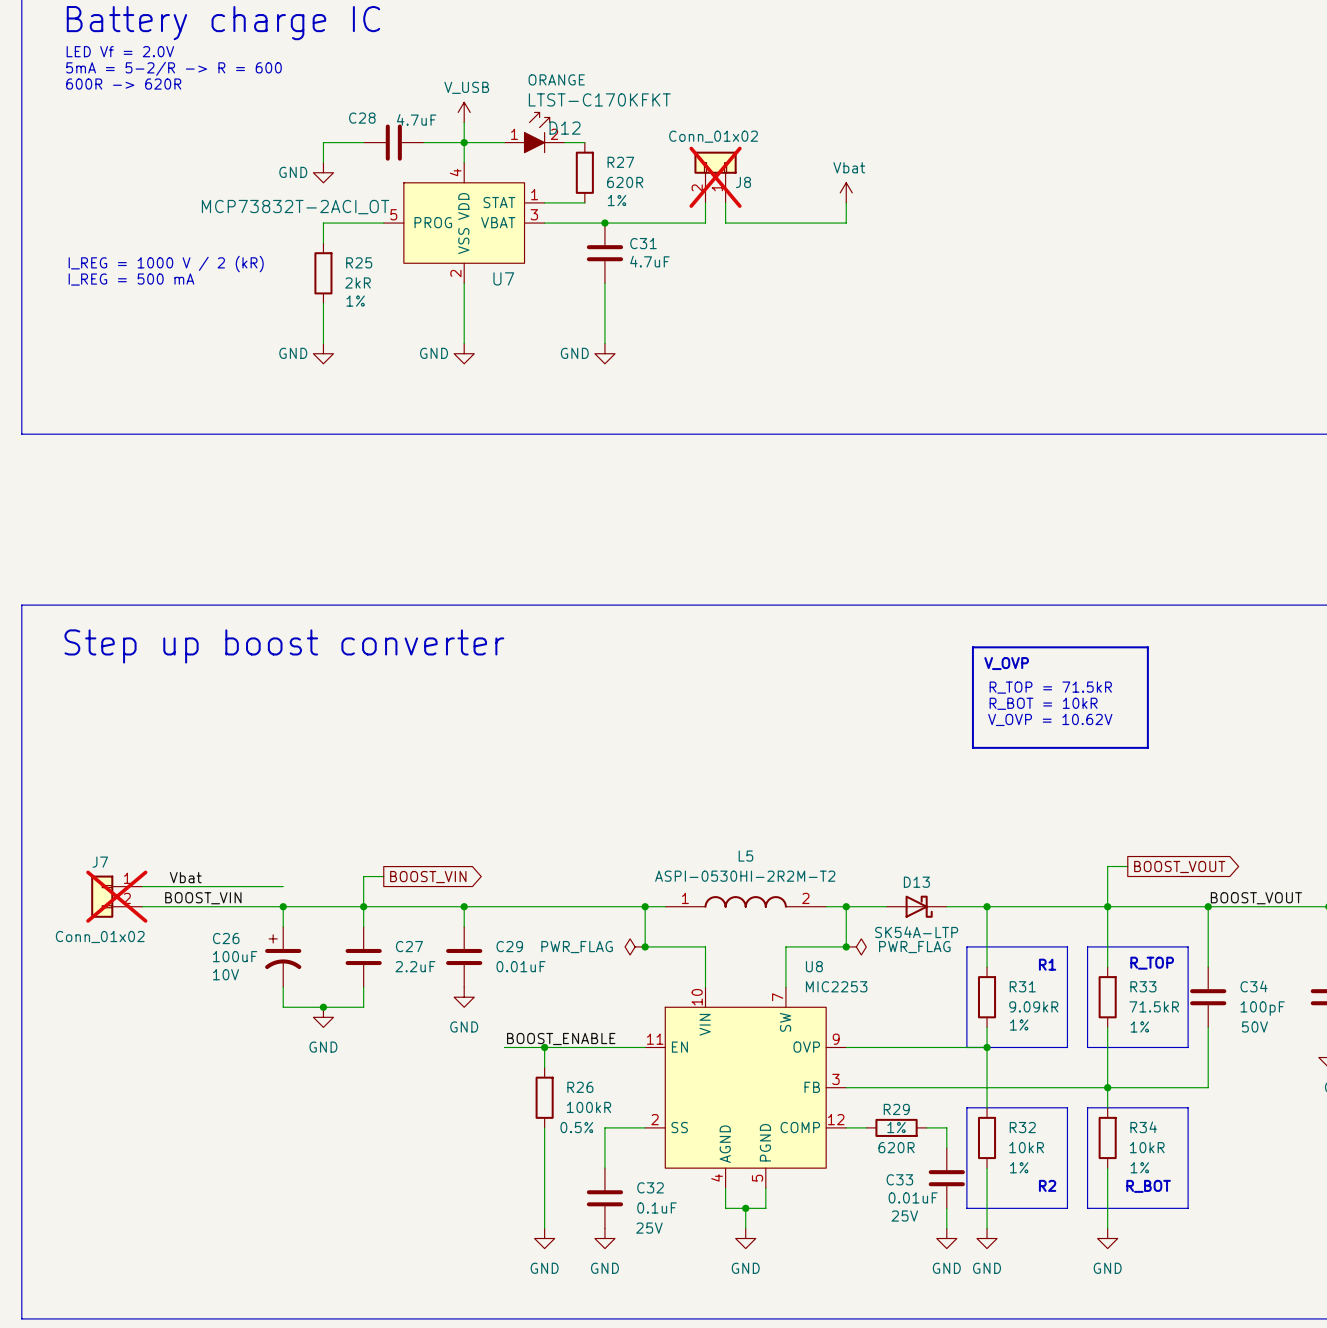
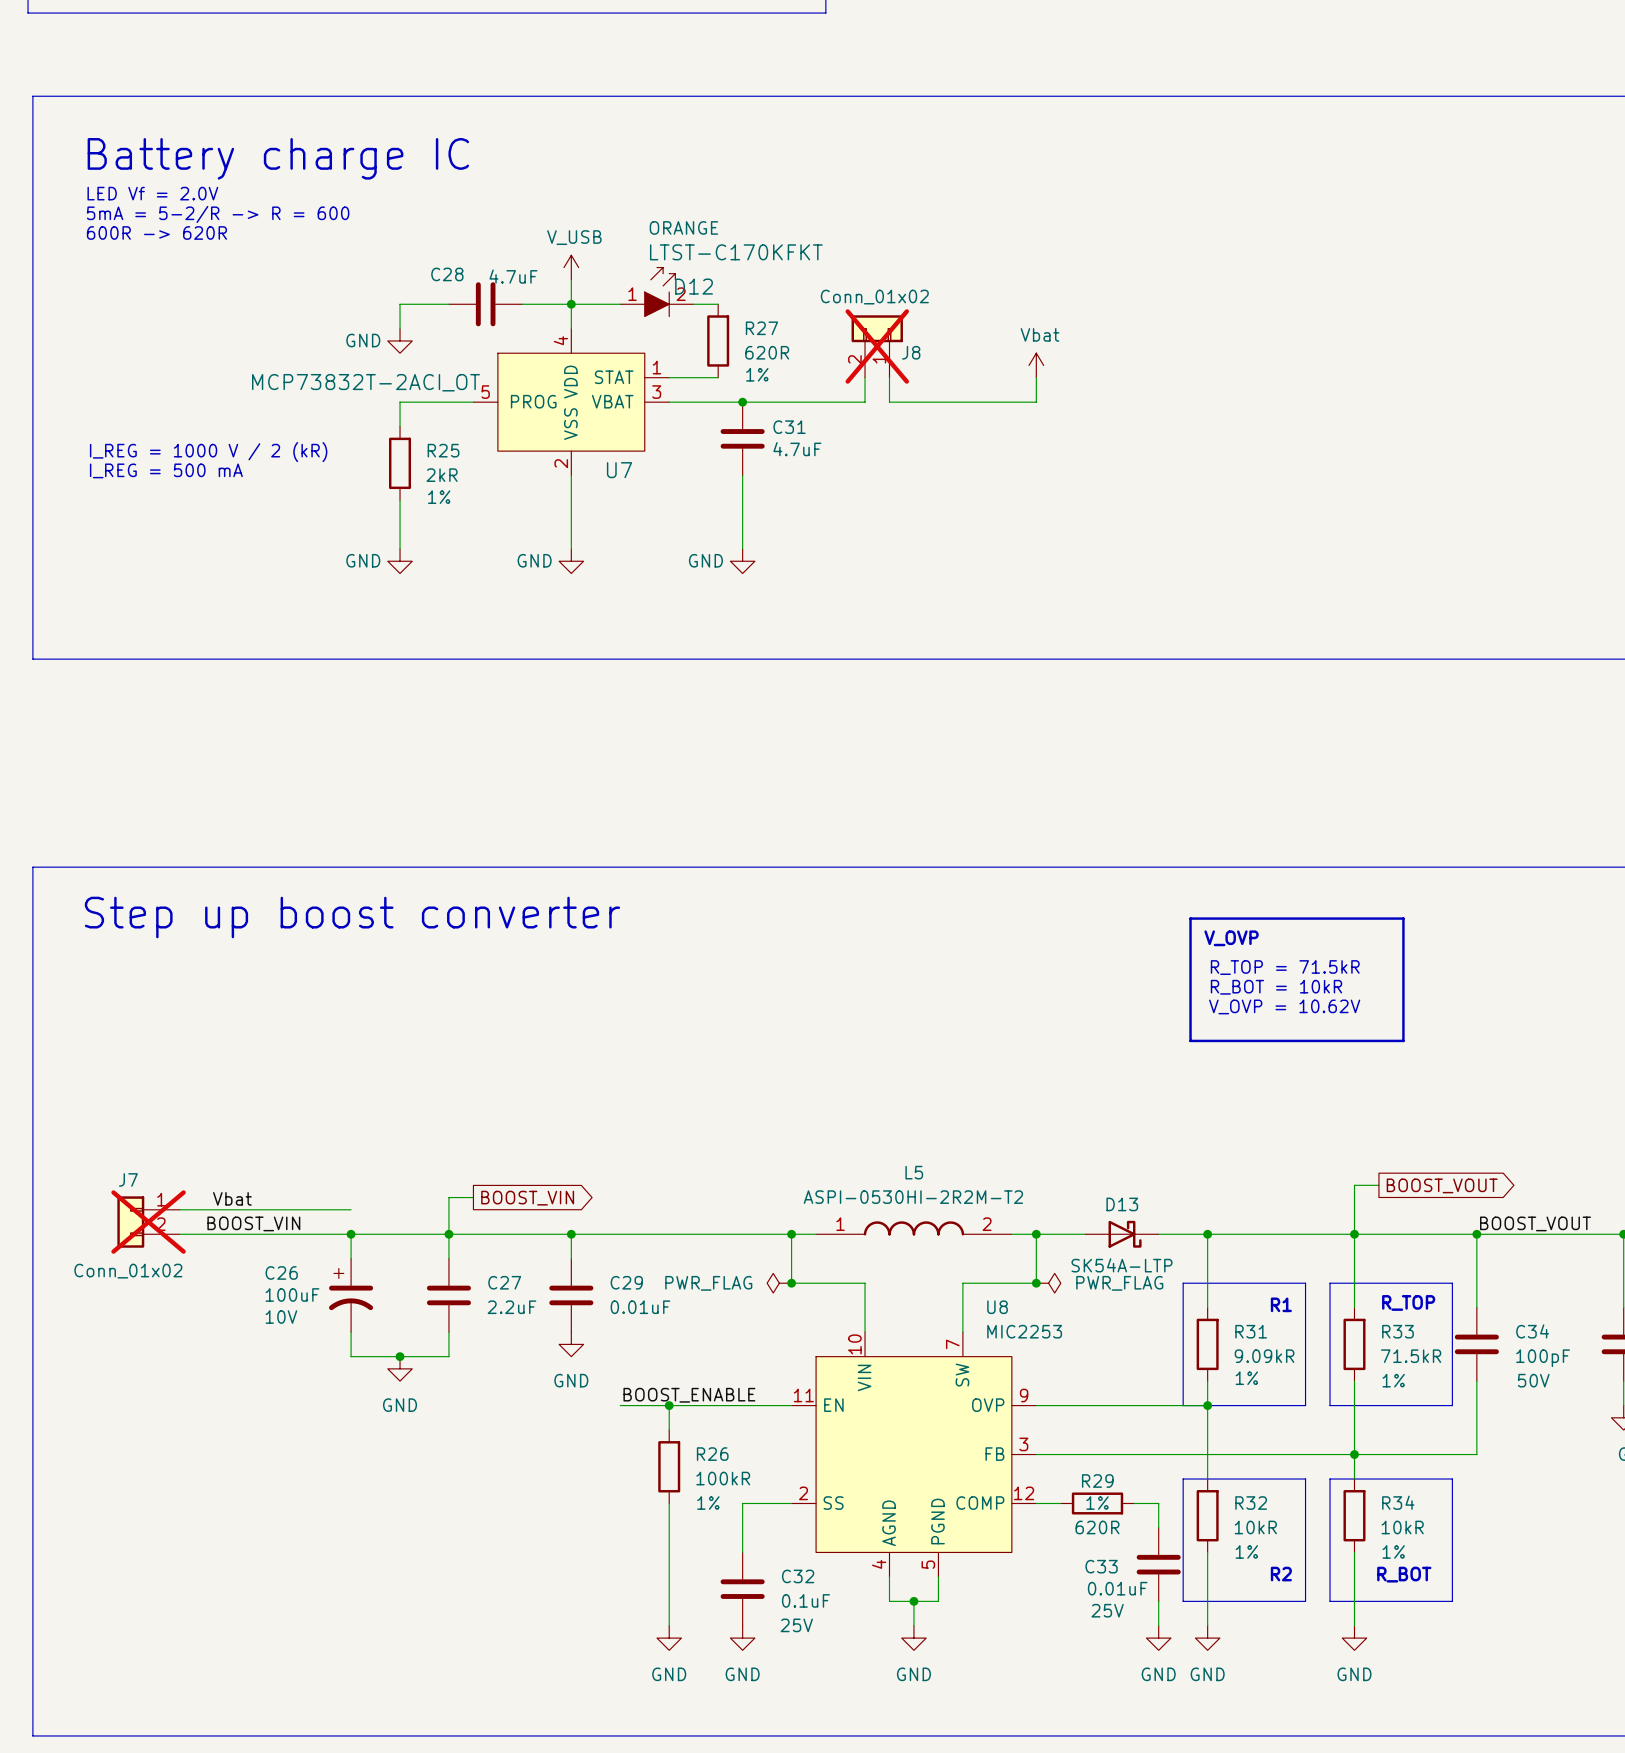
R26 text: 0.5% (576, 1127) -> 1% (708, 1503)

